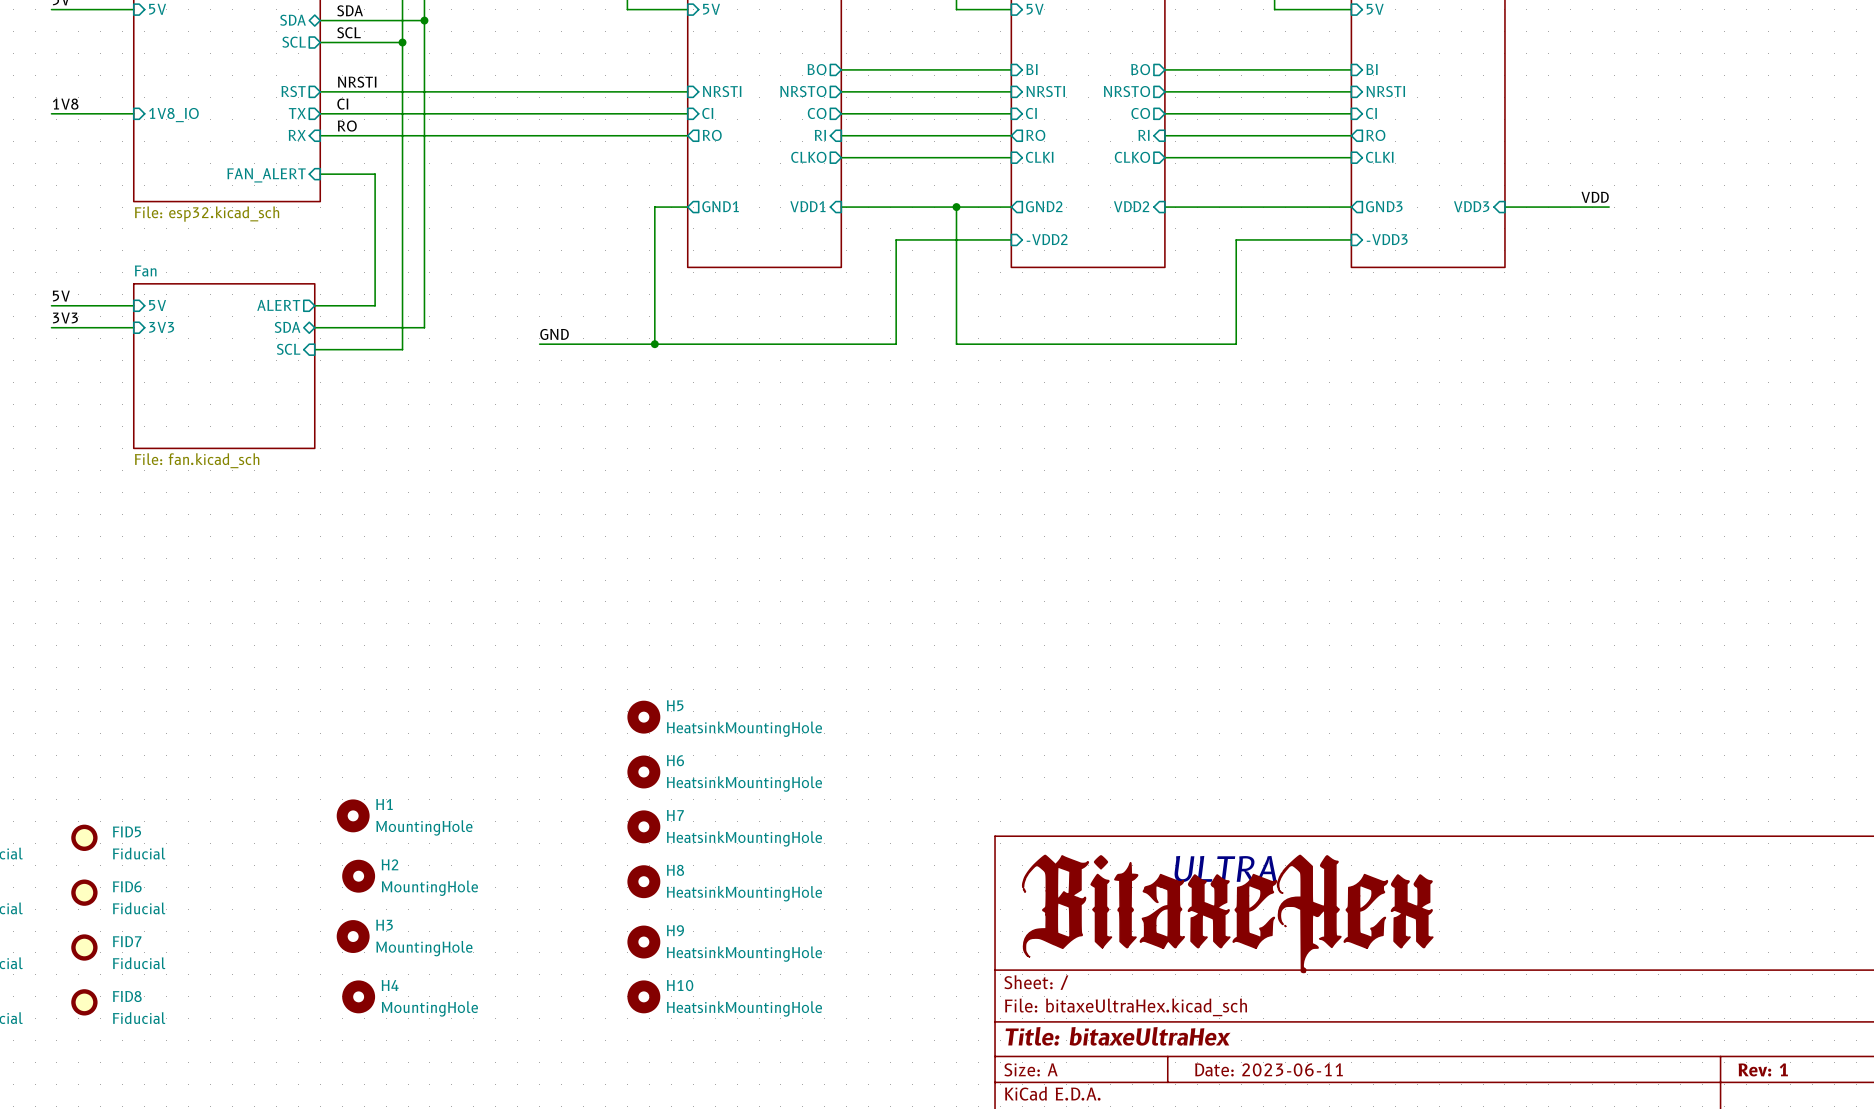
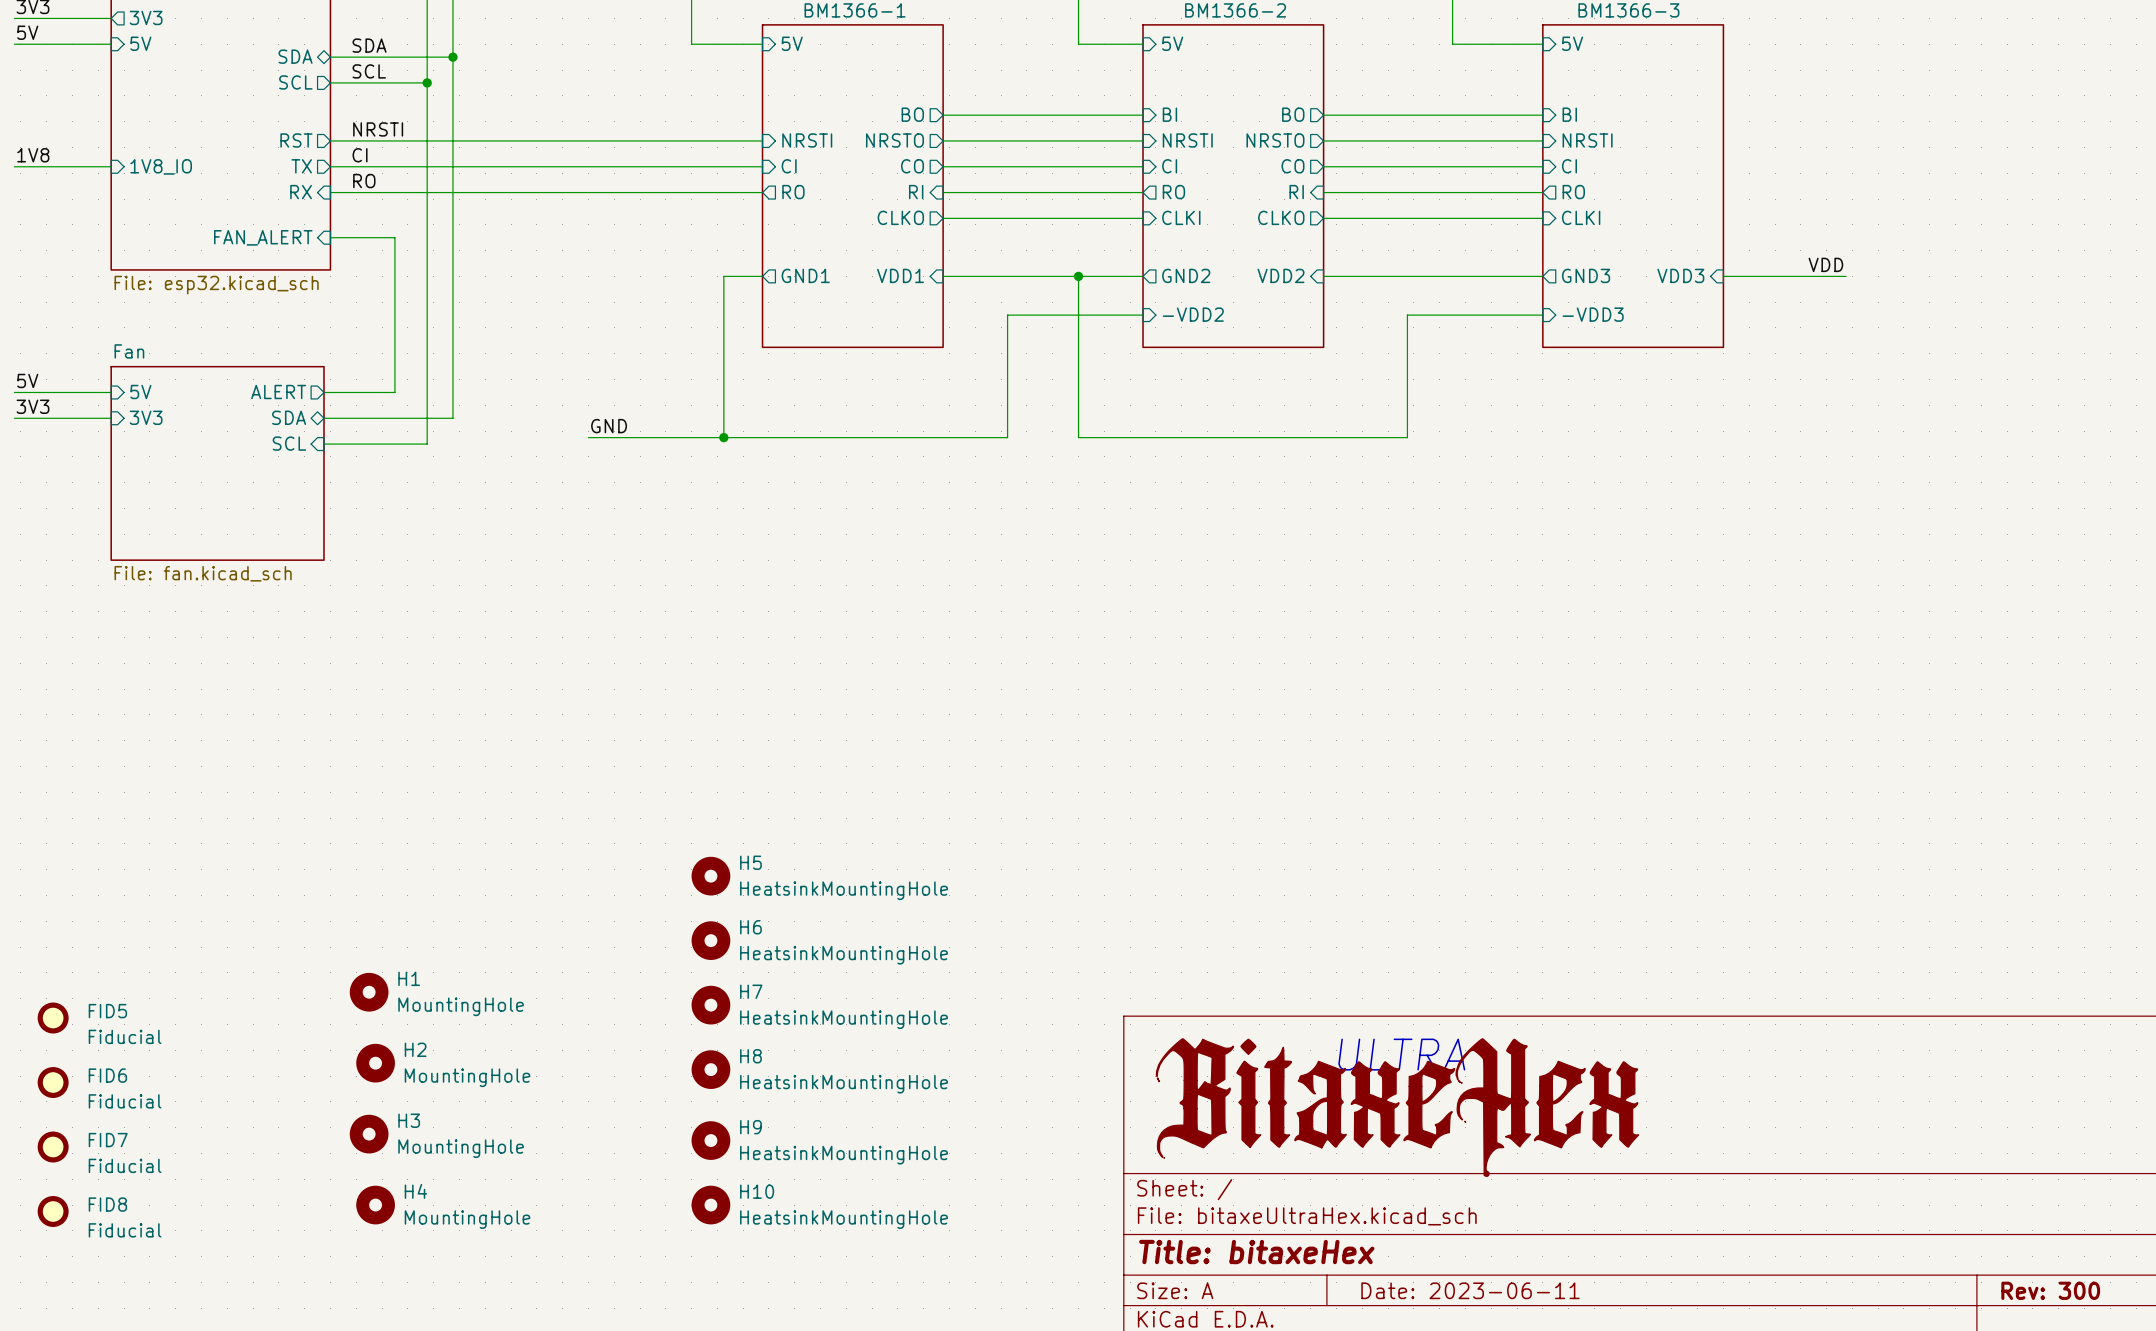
title block: Title: bitaxeUltraHex (1118, 1036) -> Title: bitaxeHex (1256, 1252)
title block: Rev: 1 (1763, 1069) -> Rev: 300 (2050, 1290)

